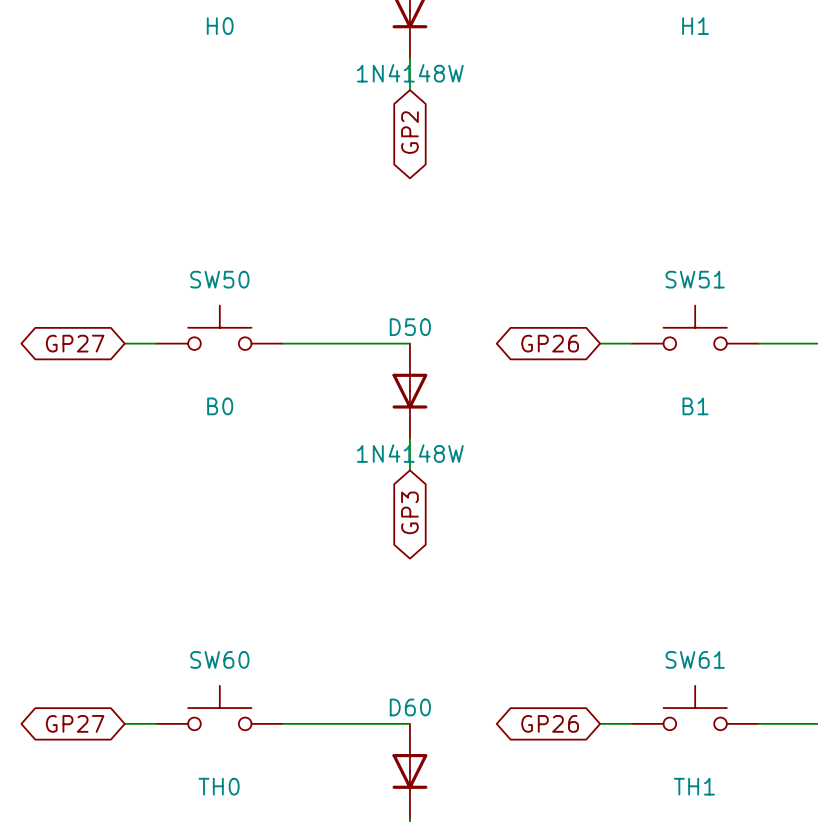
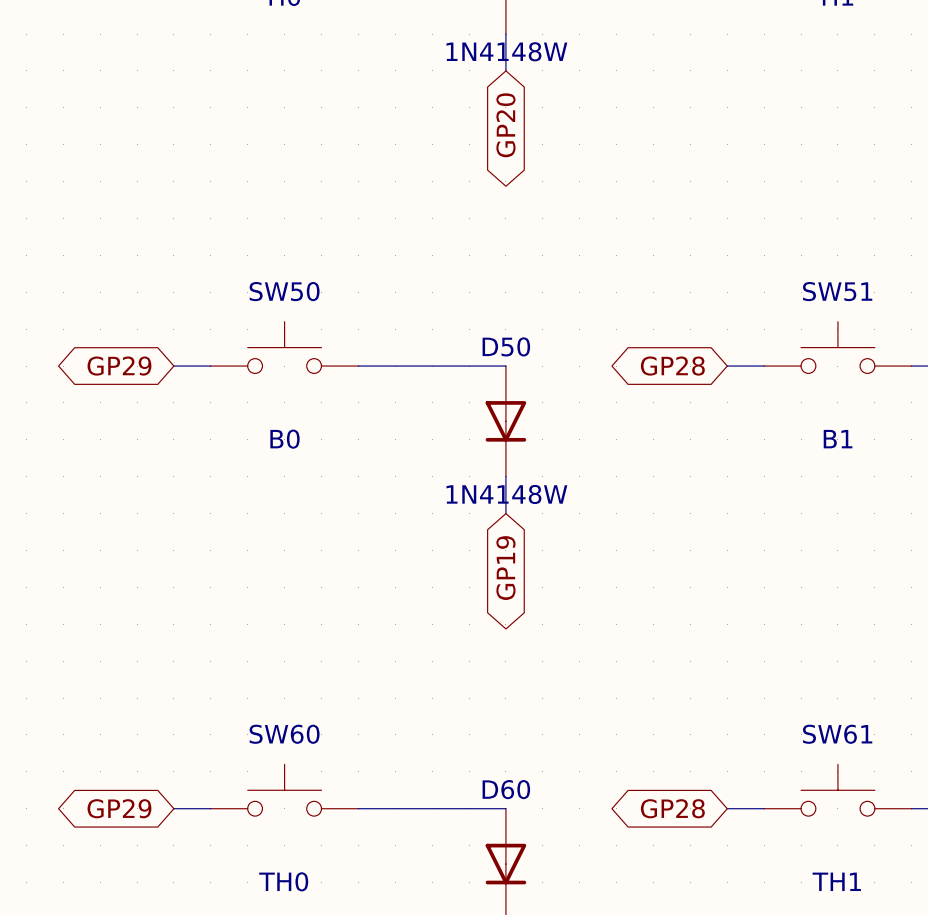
global label: GP2 (409, 132) -> GP20 (505, 125)
global label: GP27 (75, 343) -> GP29 (119, 366)
global label: GP26 (550, 343) -> GP28 (672, 366)
global label: GP3 (409, 512) -> GP19 (505, 568)
global label: GP27 (75, 723) -> GP29 (119, 808)
global label: GP26 (550, 723) -> GP28 (672, 808)

